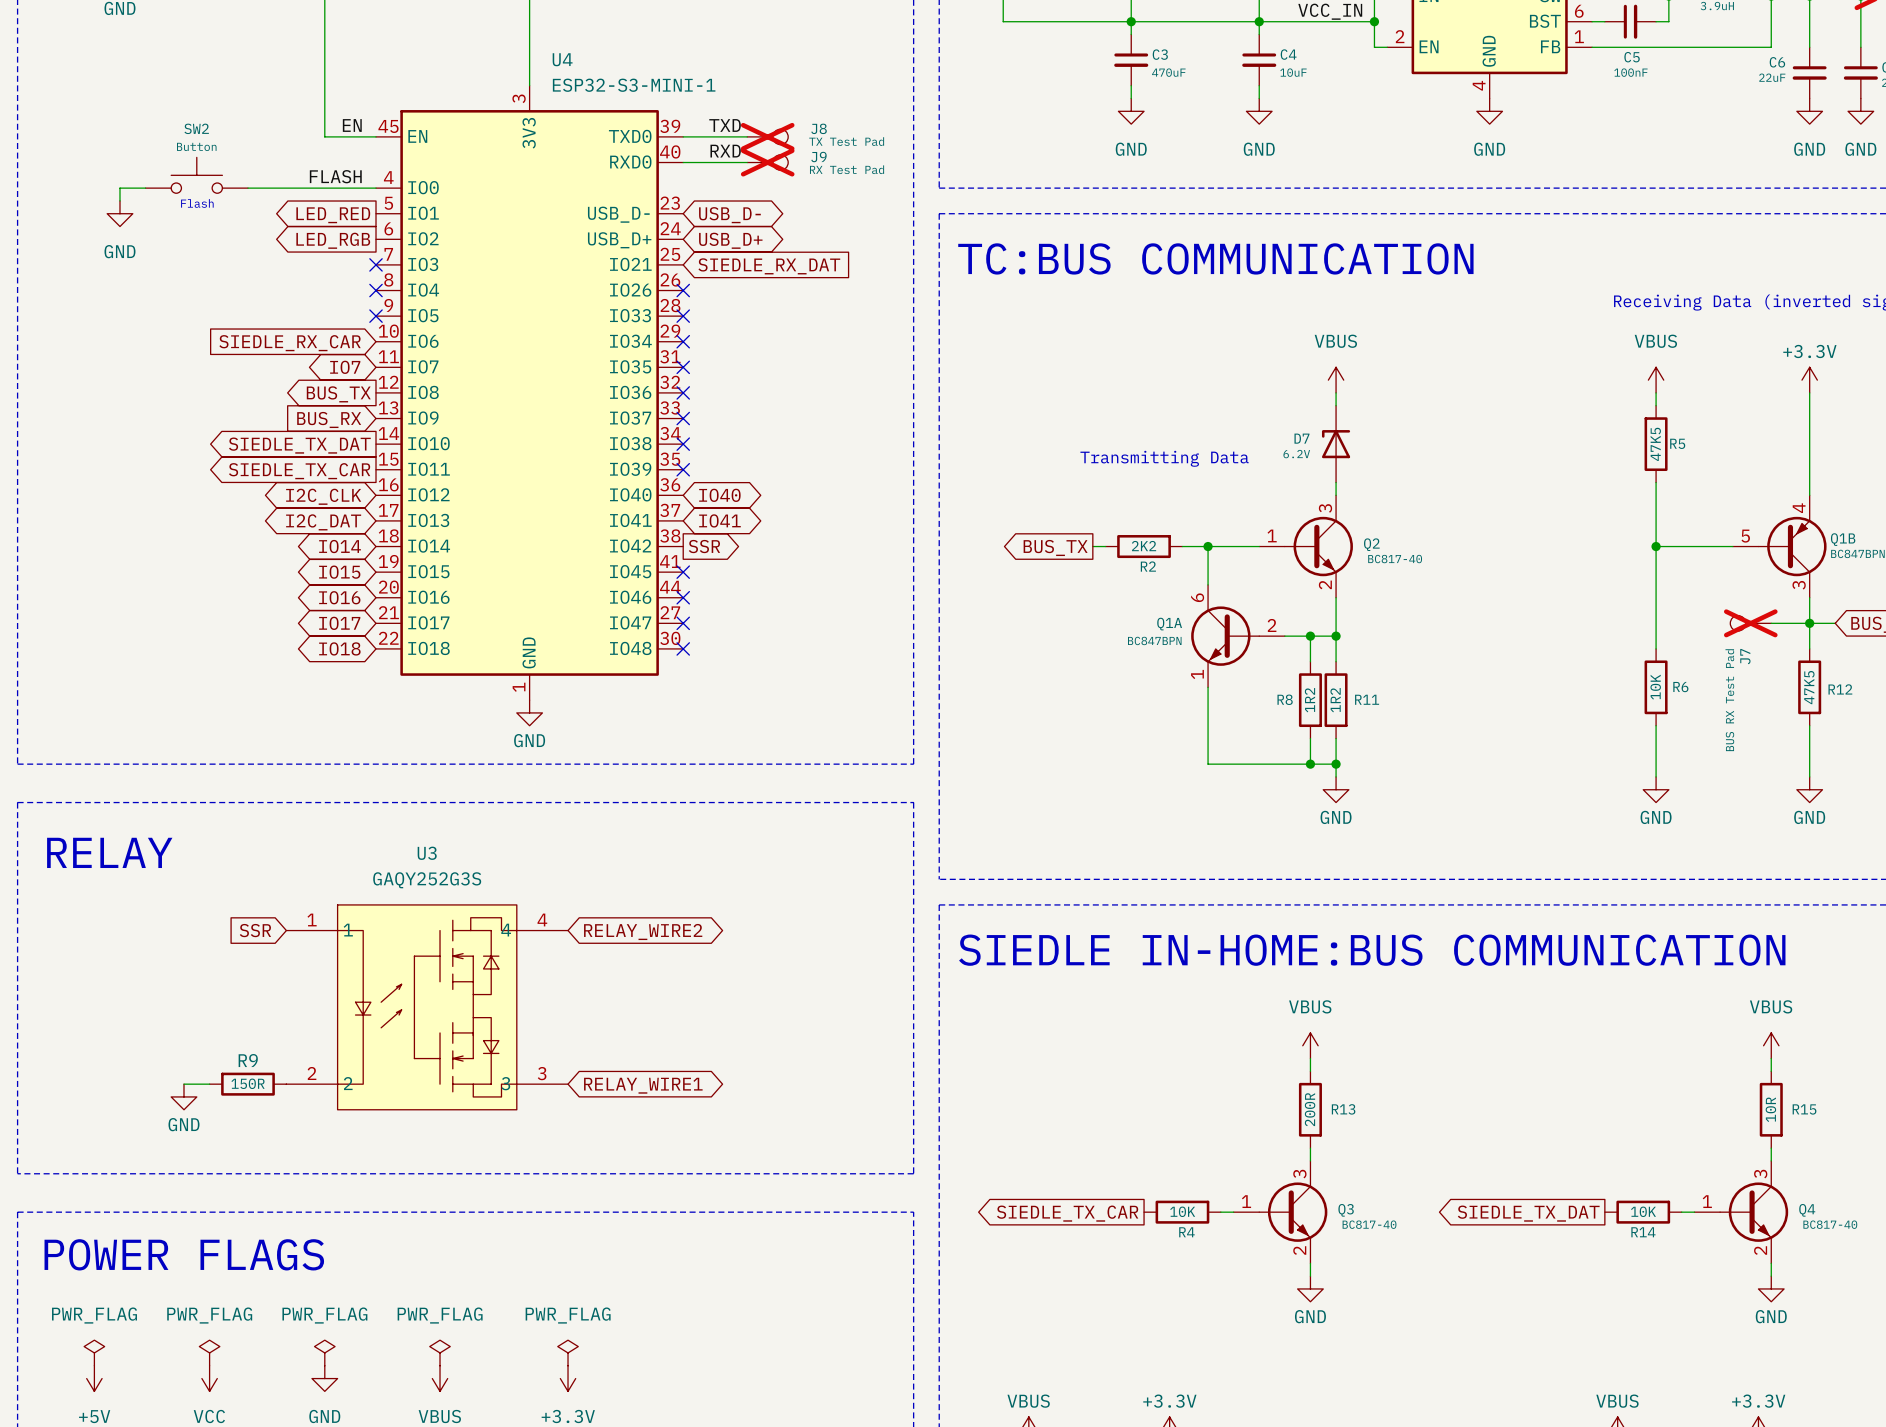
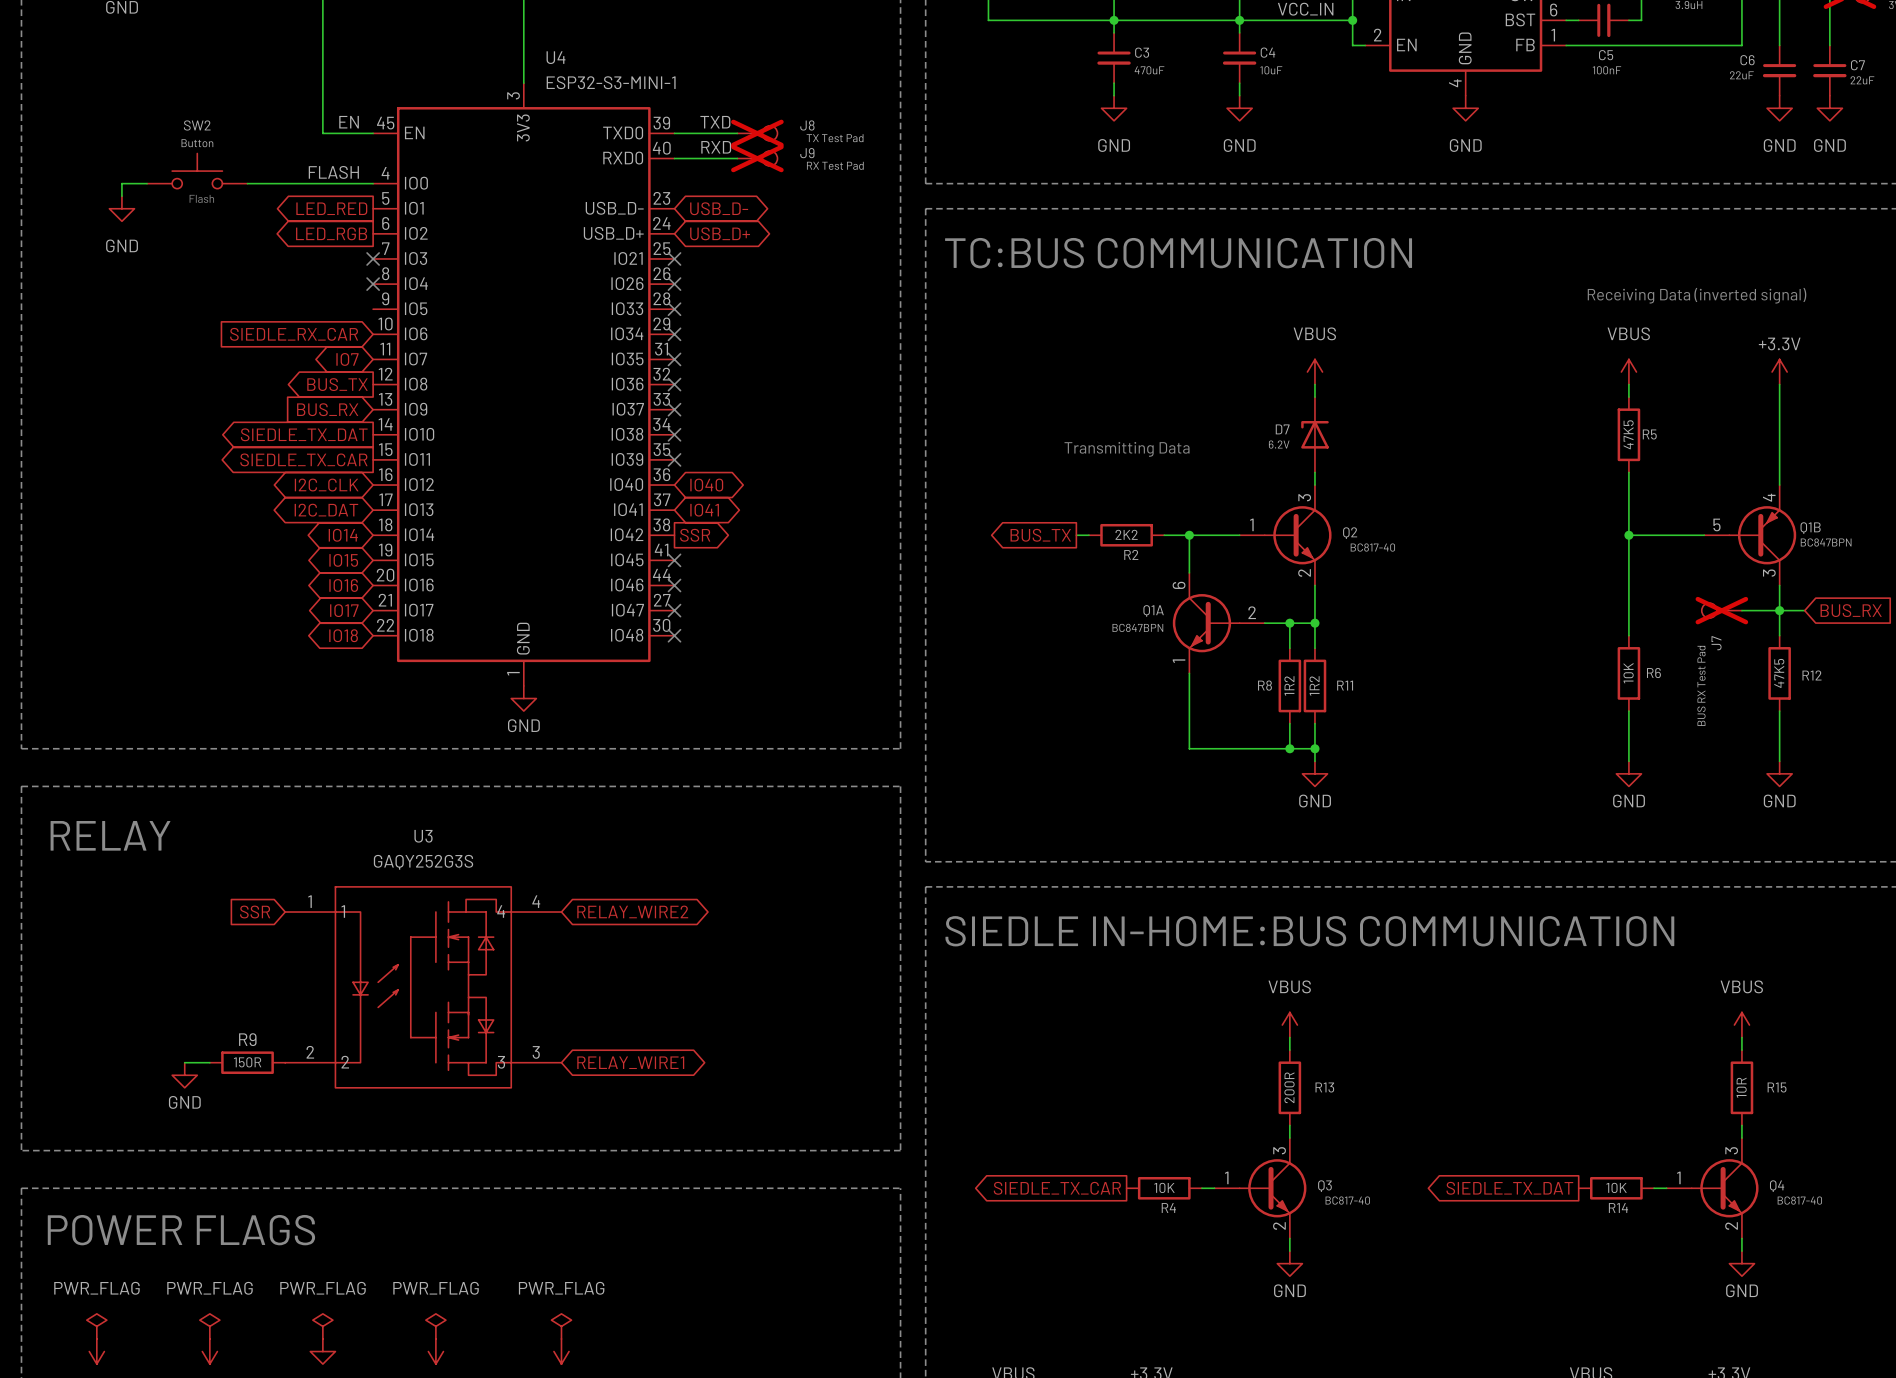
no-connect mark: none -> (674, 258)
global label: SIEDLE_RX_DAT (769, 266) -> none
no-connect mark: (376, 316) -> none

